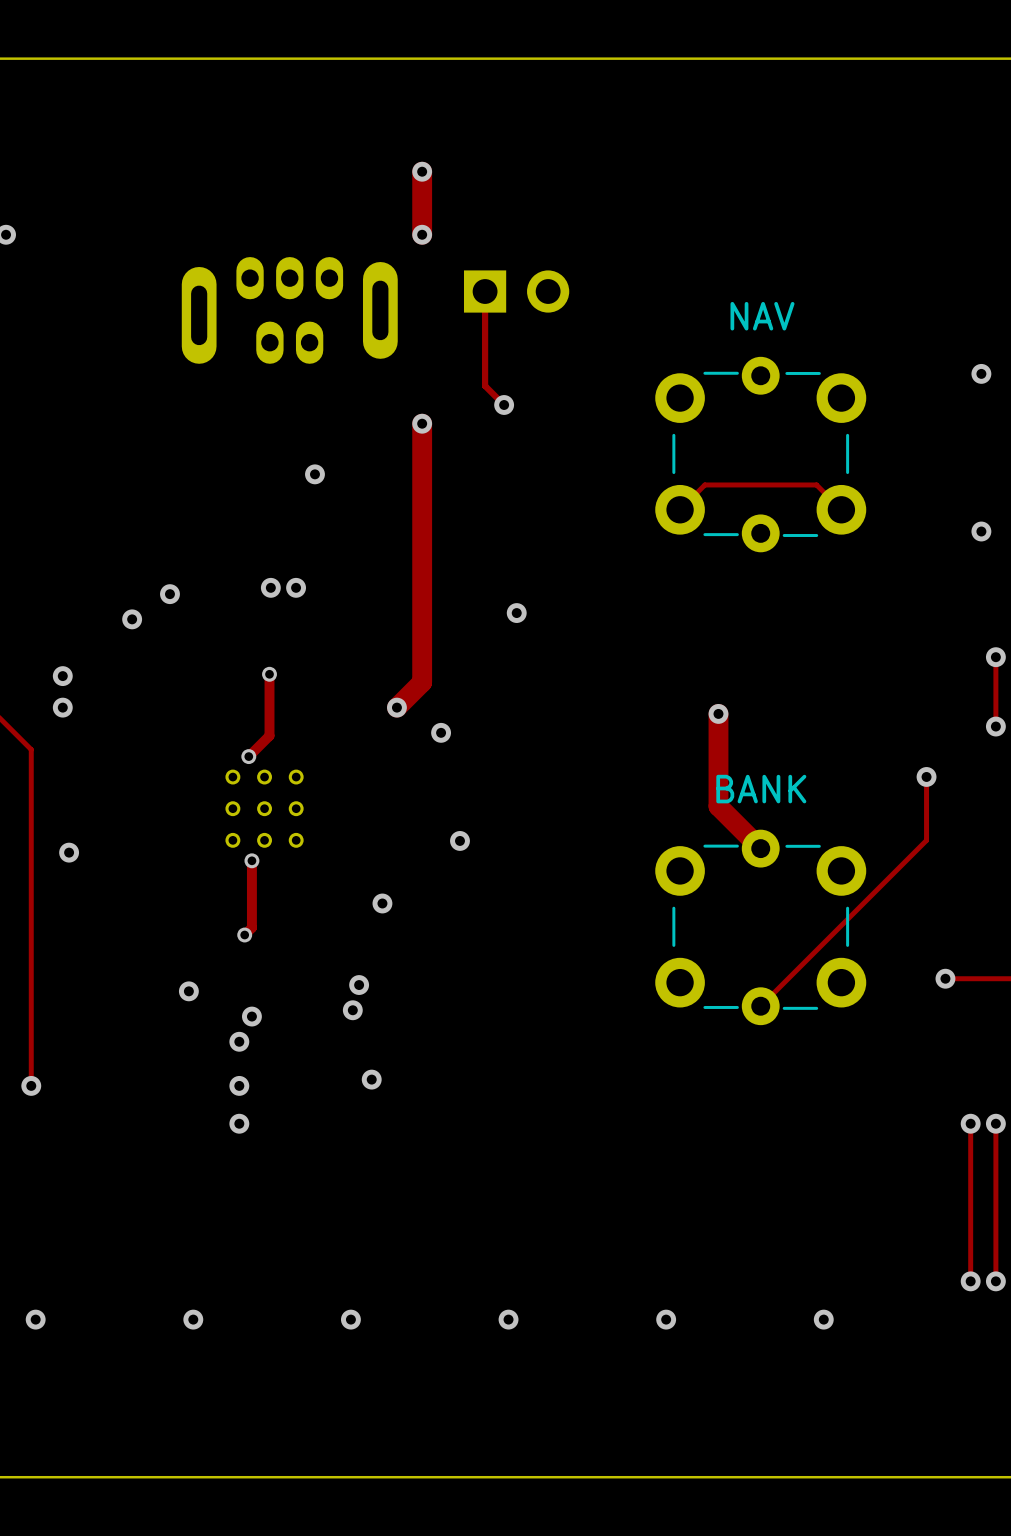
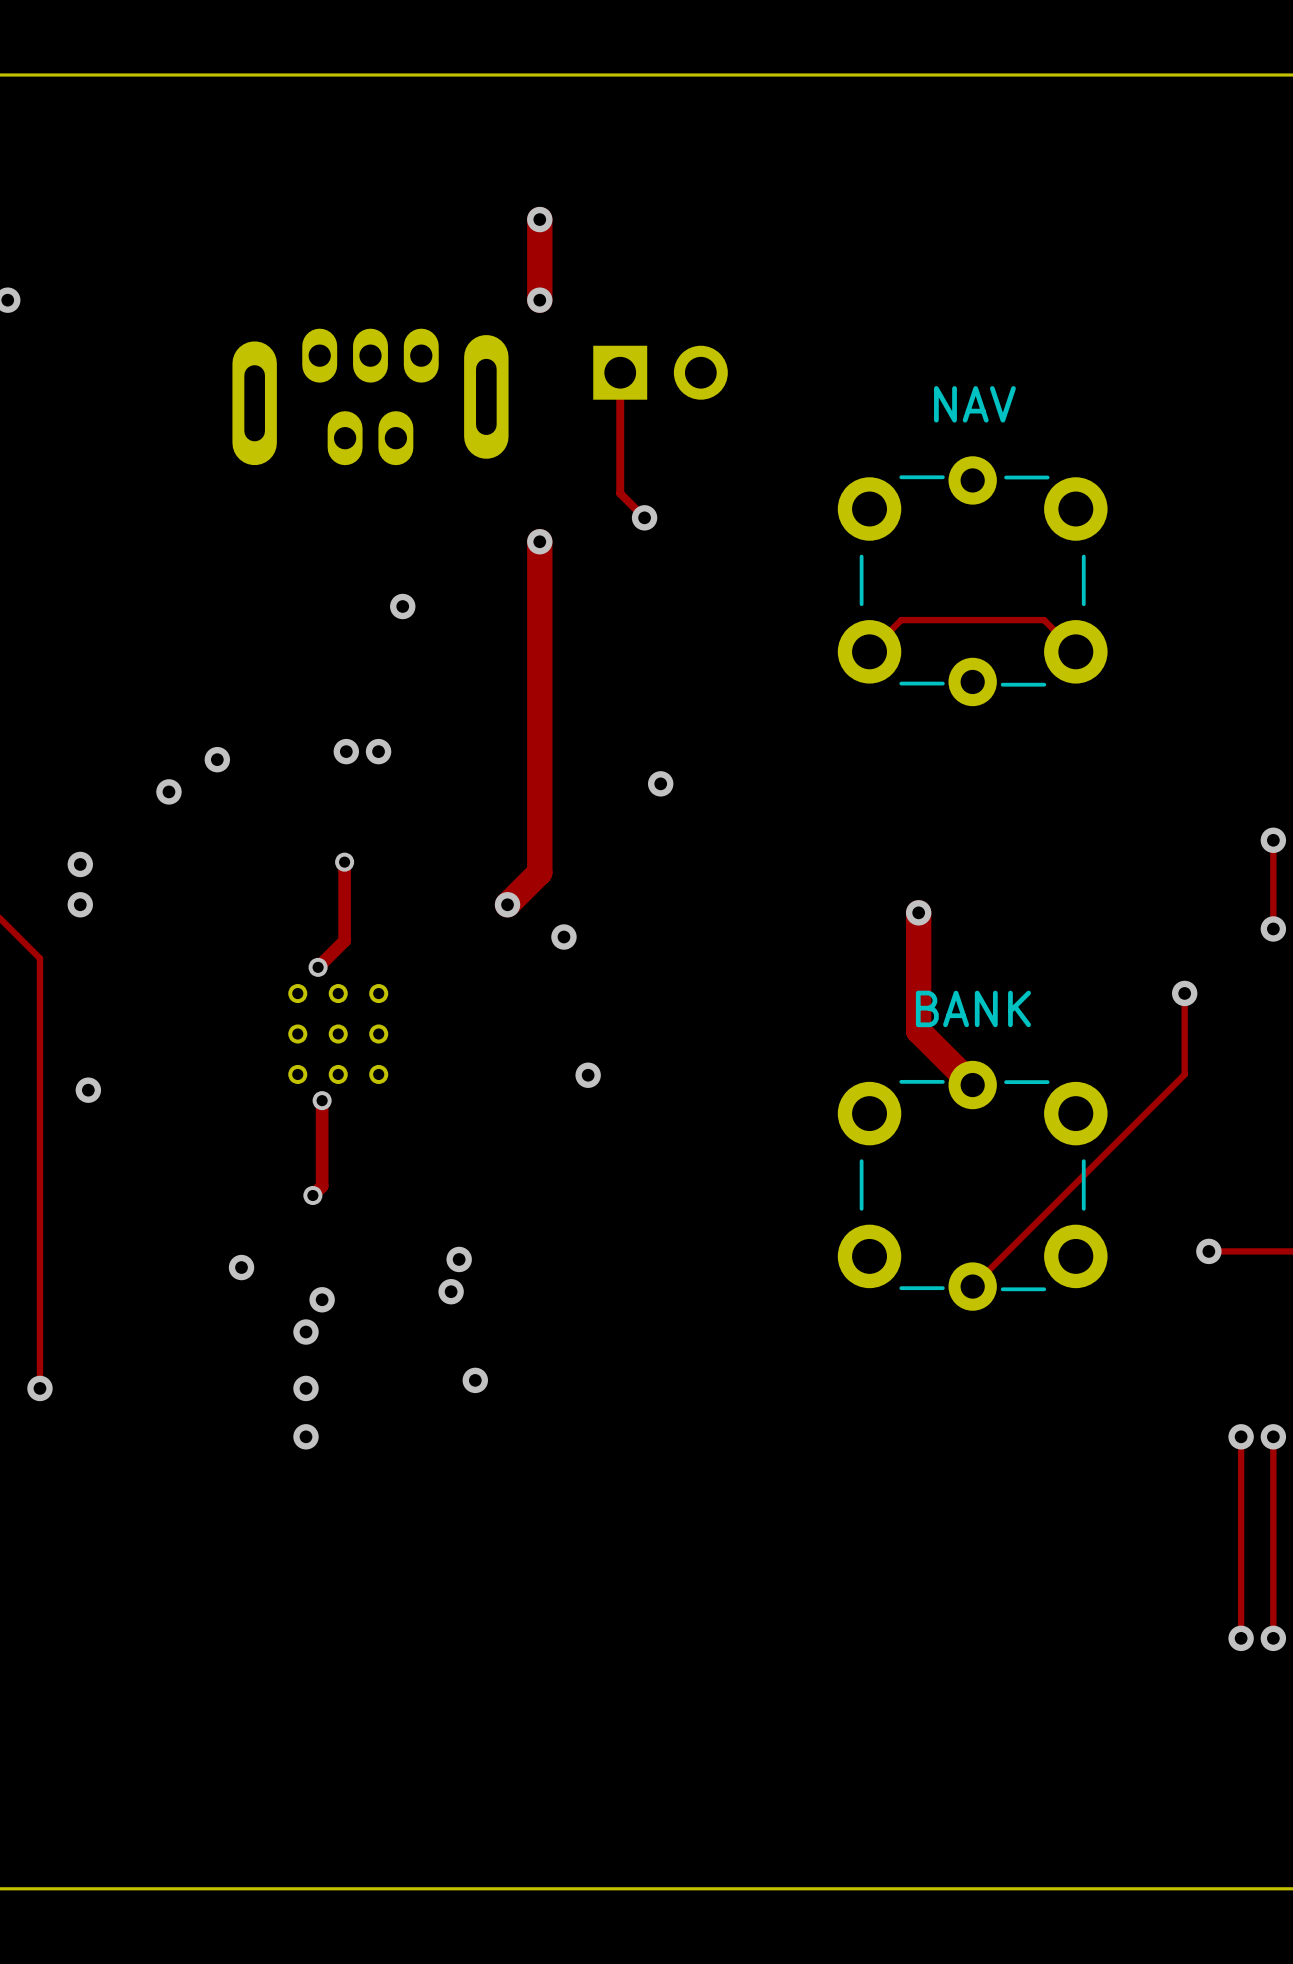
via: (981, 373) -> none
via: (981, 531) -> none
via: (382, 903) -> none
via: (35, 1319) -> none
via: (193, 1319) -> none
via: (350, 1319) -> none
via: (508, 1319) -> none
via: (666, 1319) -> none
via: (823, 1319) -> none

